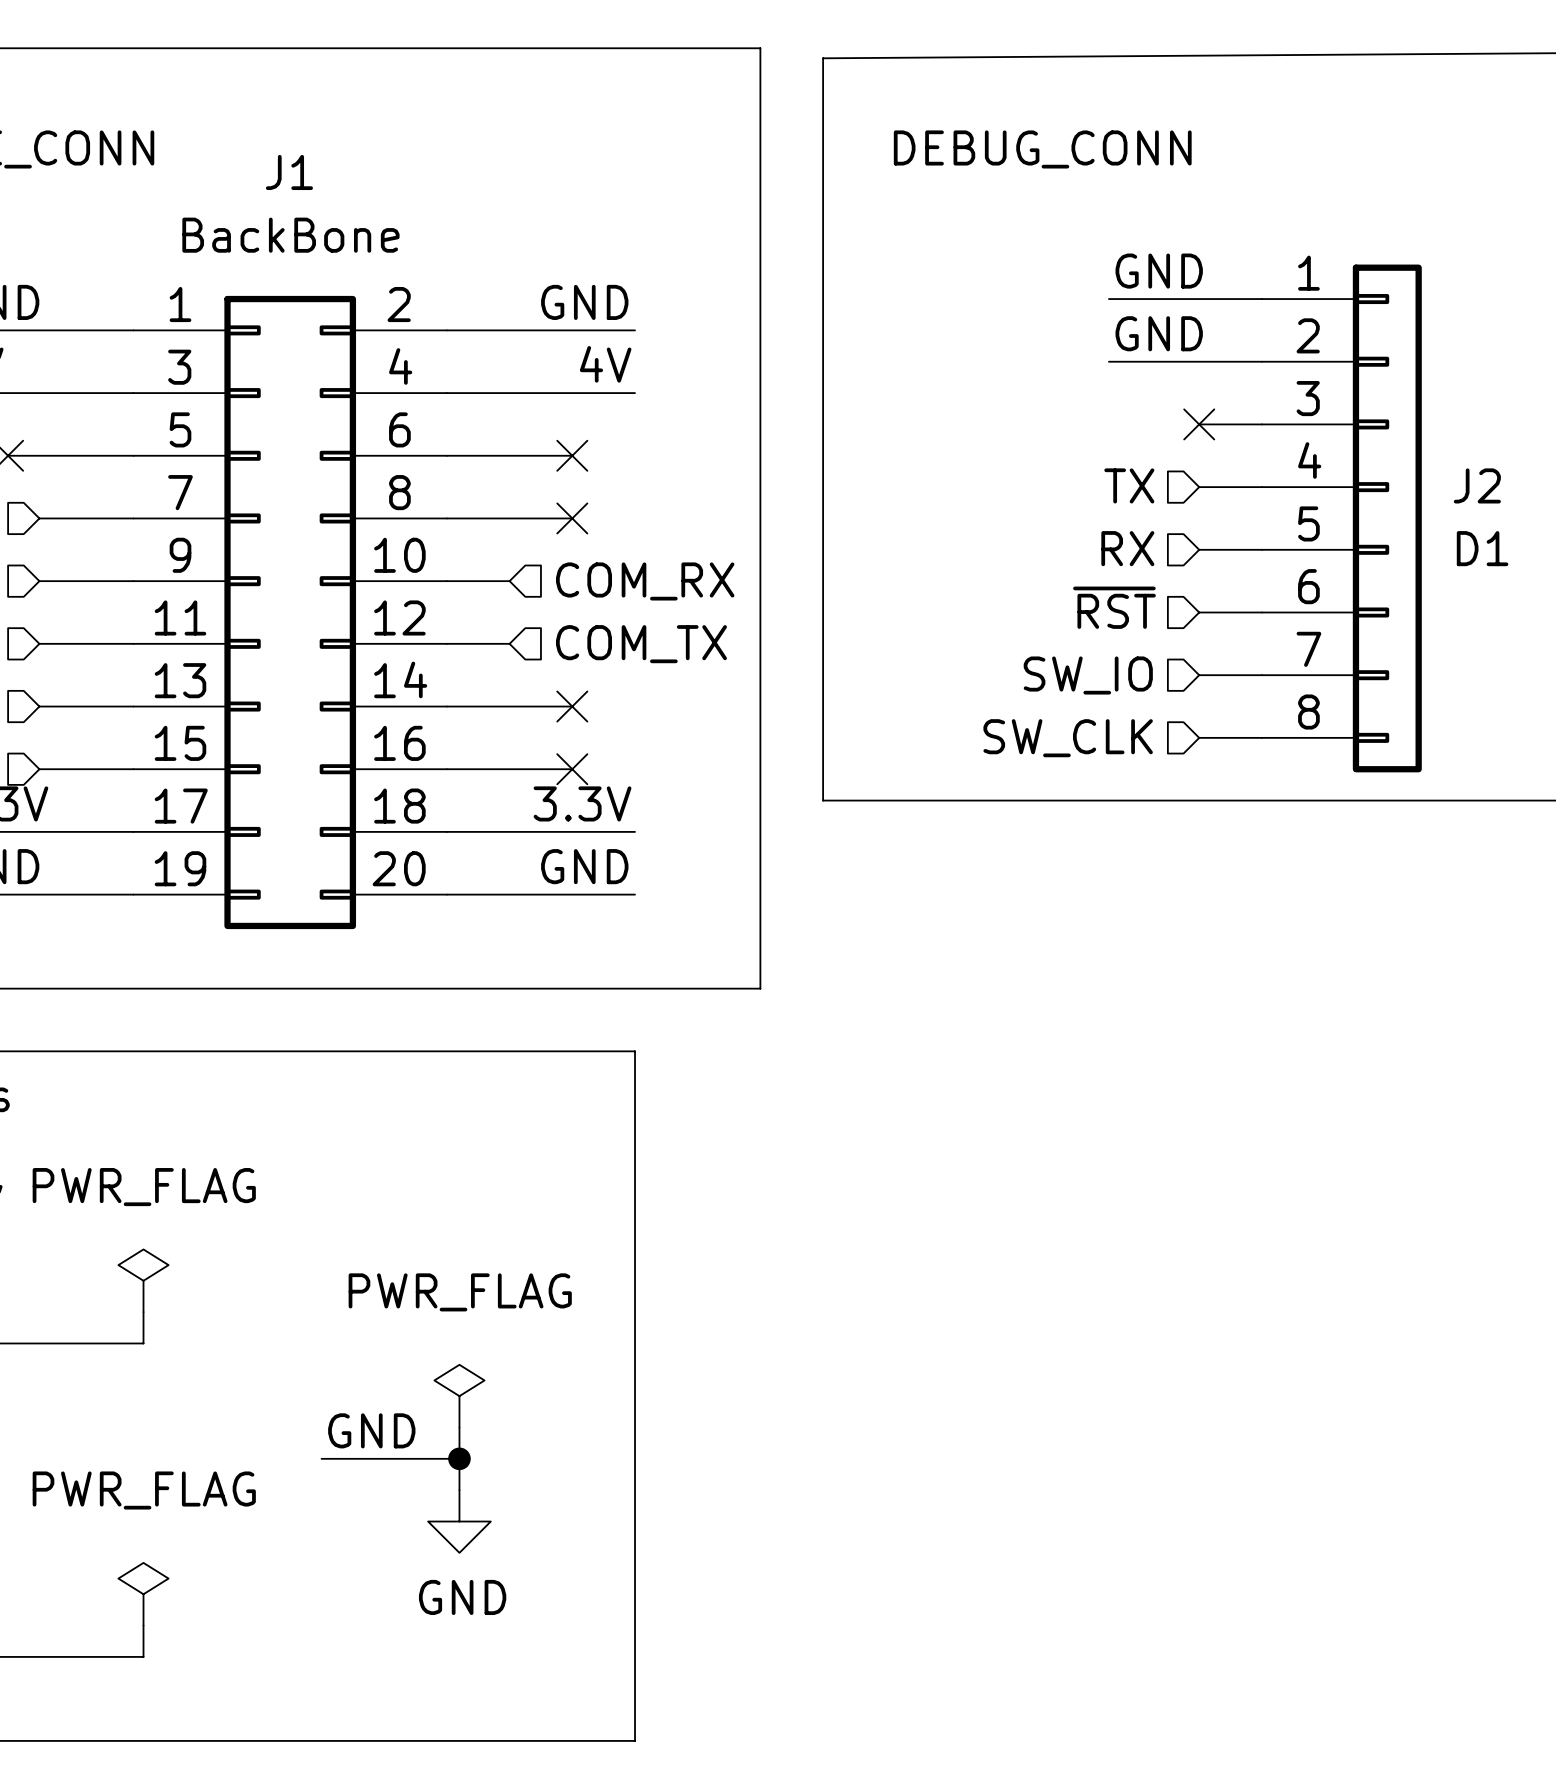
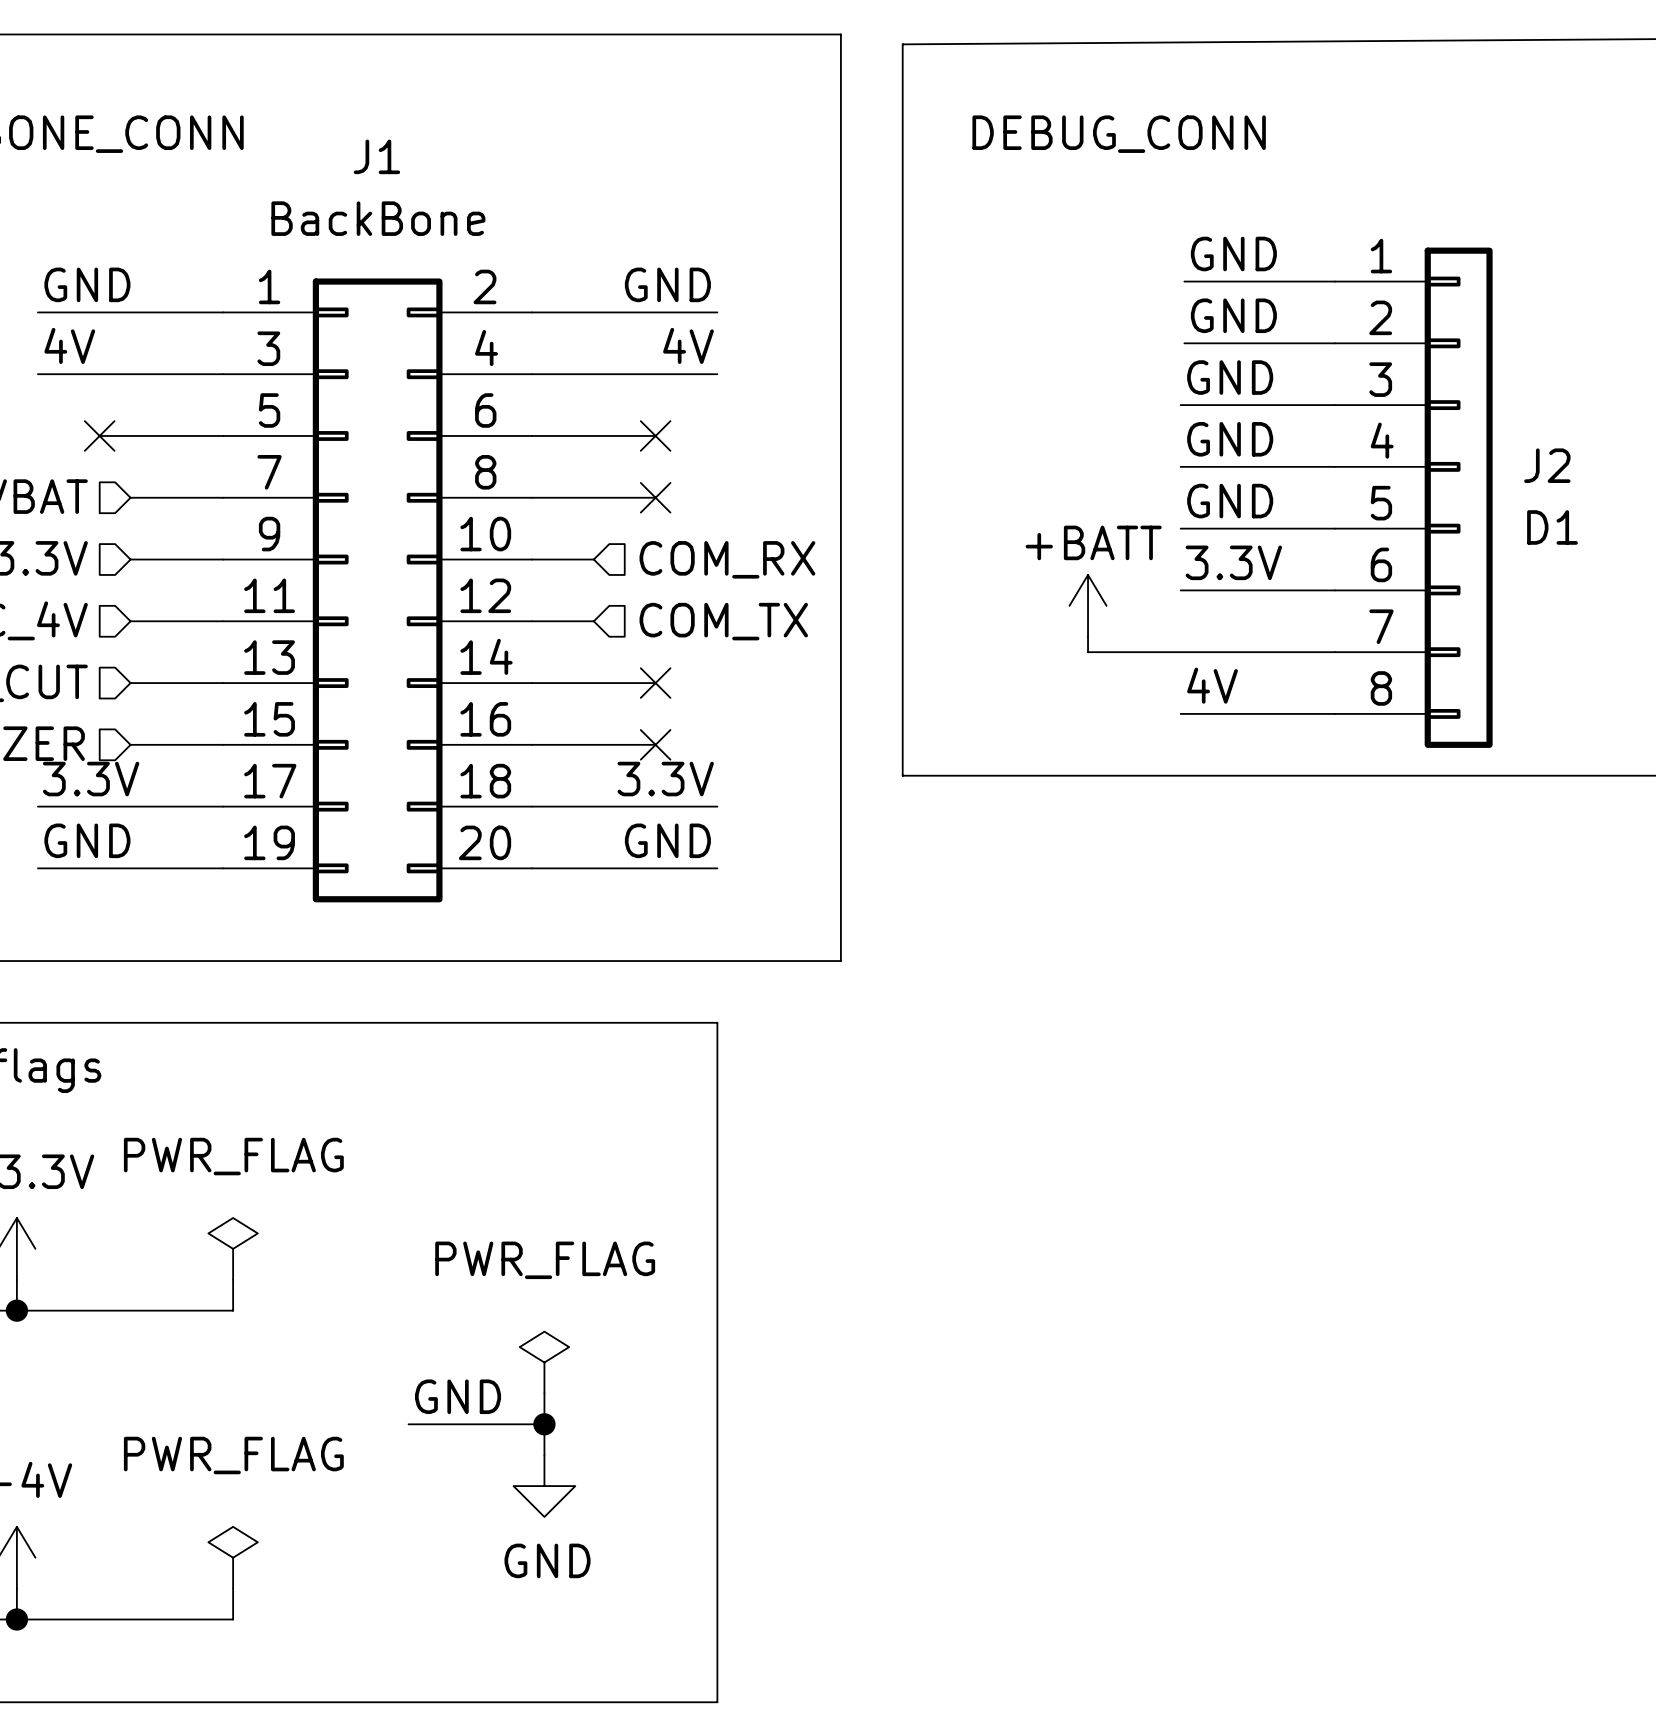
label: none -> GND (1230, 377)
wire: none -> (1180, 405) (1273, 405)
no-connect mark: (1199, 424) -> none
label: none -> GND (1230, 439)
hierarchical label: TX (1129, 485) -> none
wire: none -> (1180, 466) (1273, 466)
label: none -> GND (1230, 501)
hierarchical label: RX (1127, 548) -> none
wire: none -> (1180, 528) (1273, 528)
label: none -> 3.3V (1233, 562)
hierarchical label: ~{RST} (1114, 607) -> none
wire: none -> (1180, 590) (1273, 590)
power symbol: none -> +BATT (1088, 605)
wire: none -> (1088, 636) (1088, 652) (1273, 652)
hierarchical label: SW_IO (1088, 675) -> none
label: none -> 4V (1212, 685)
wire: none -> (1180, 713) (1273, 713)
hierarchical label: SW_CLK (1068, 738) -> none

